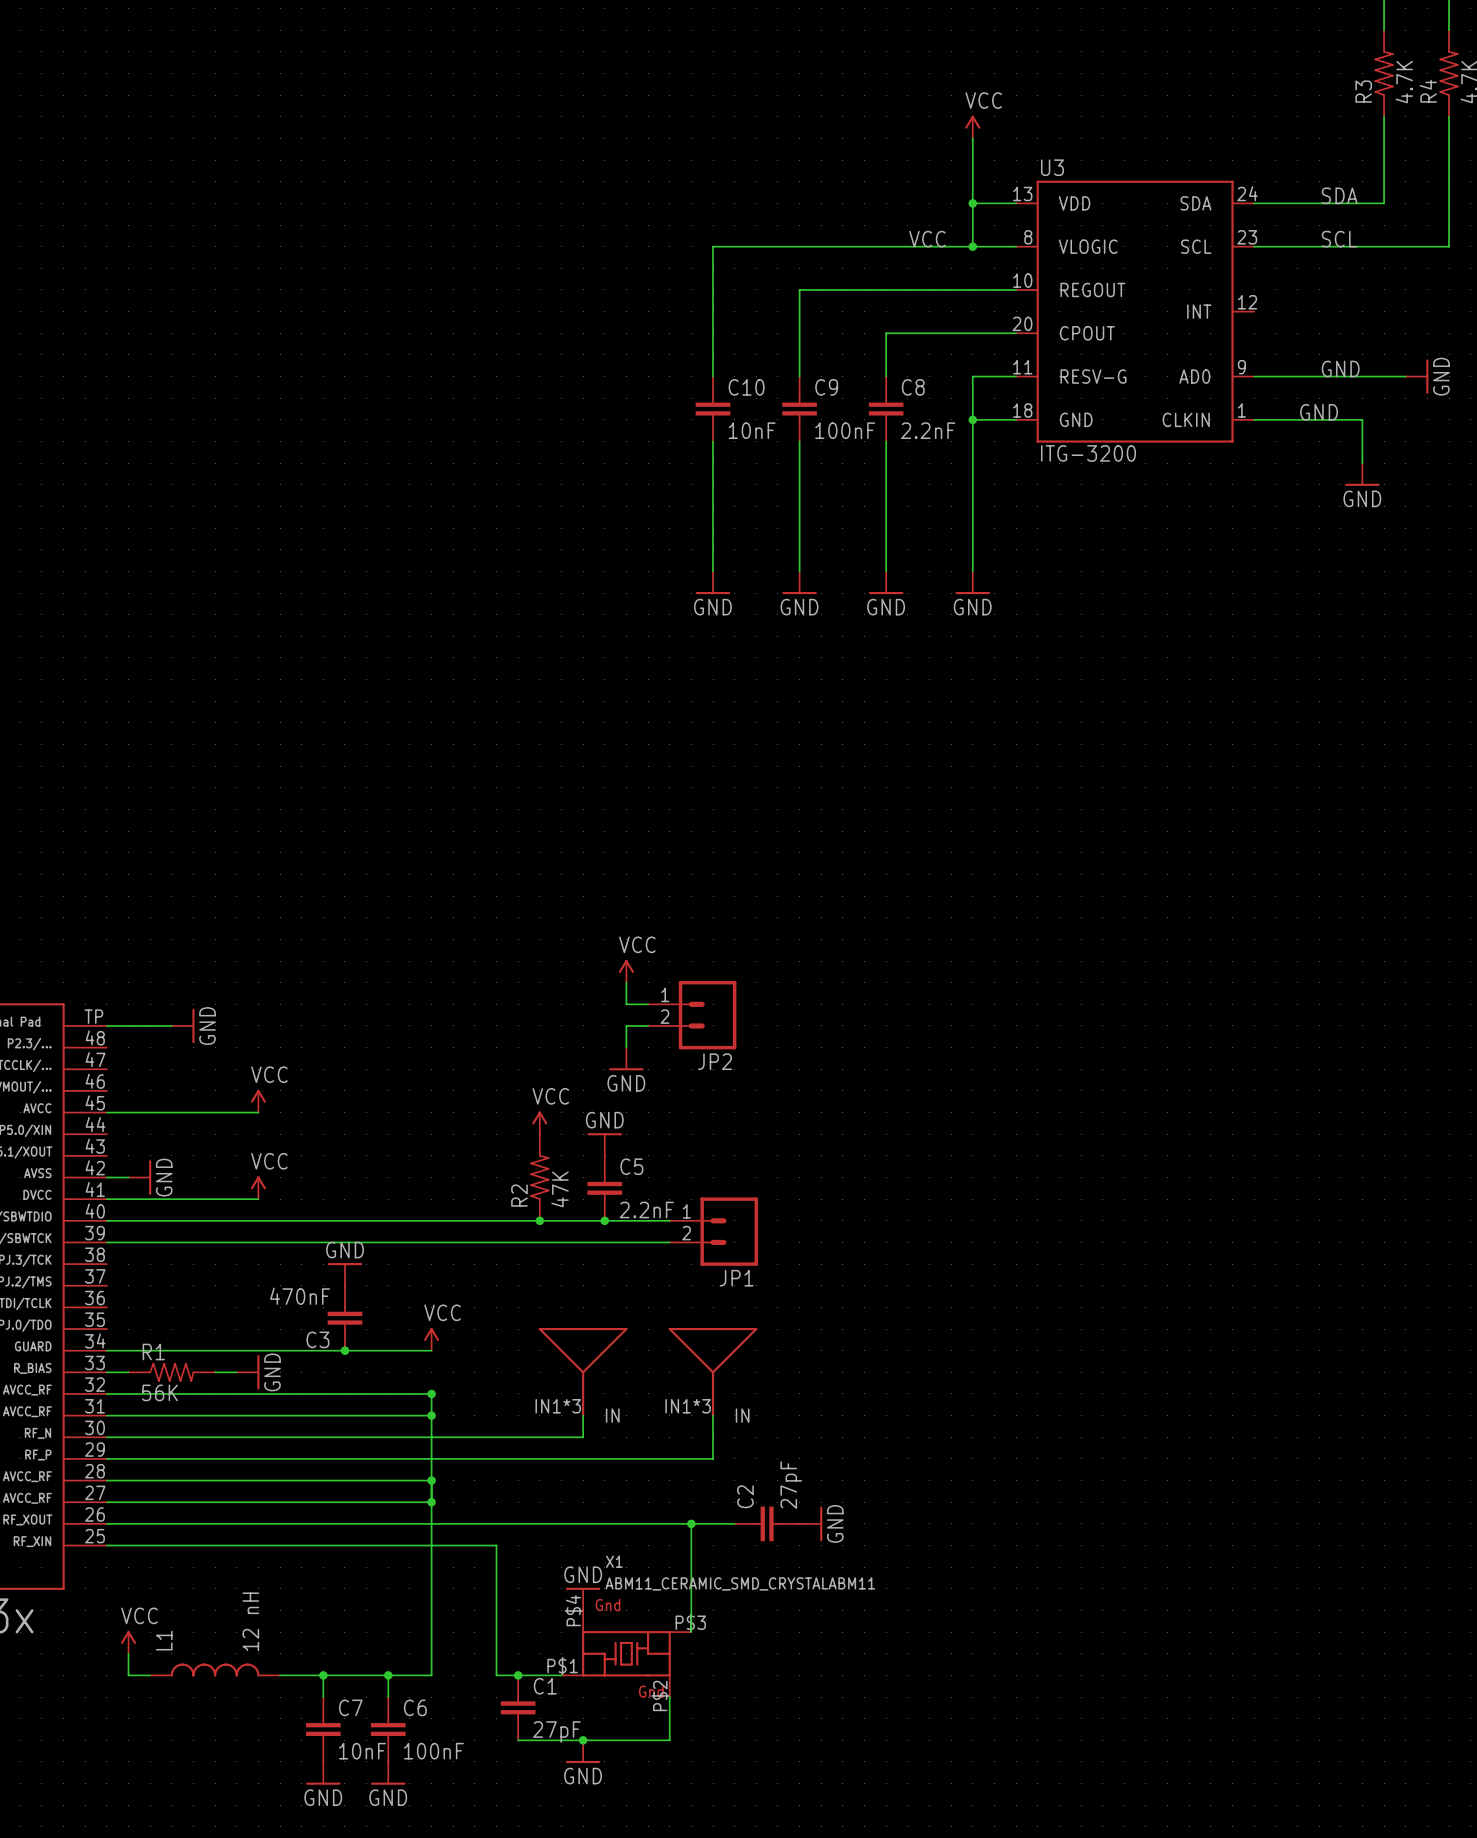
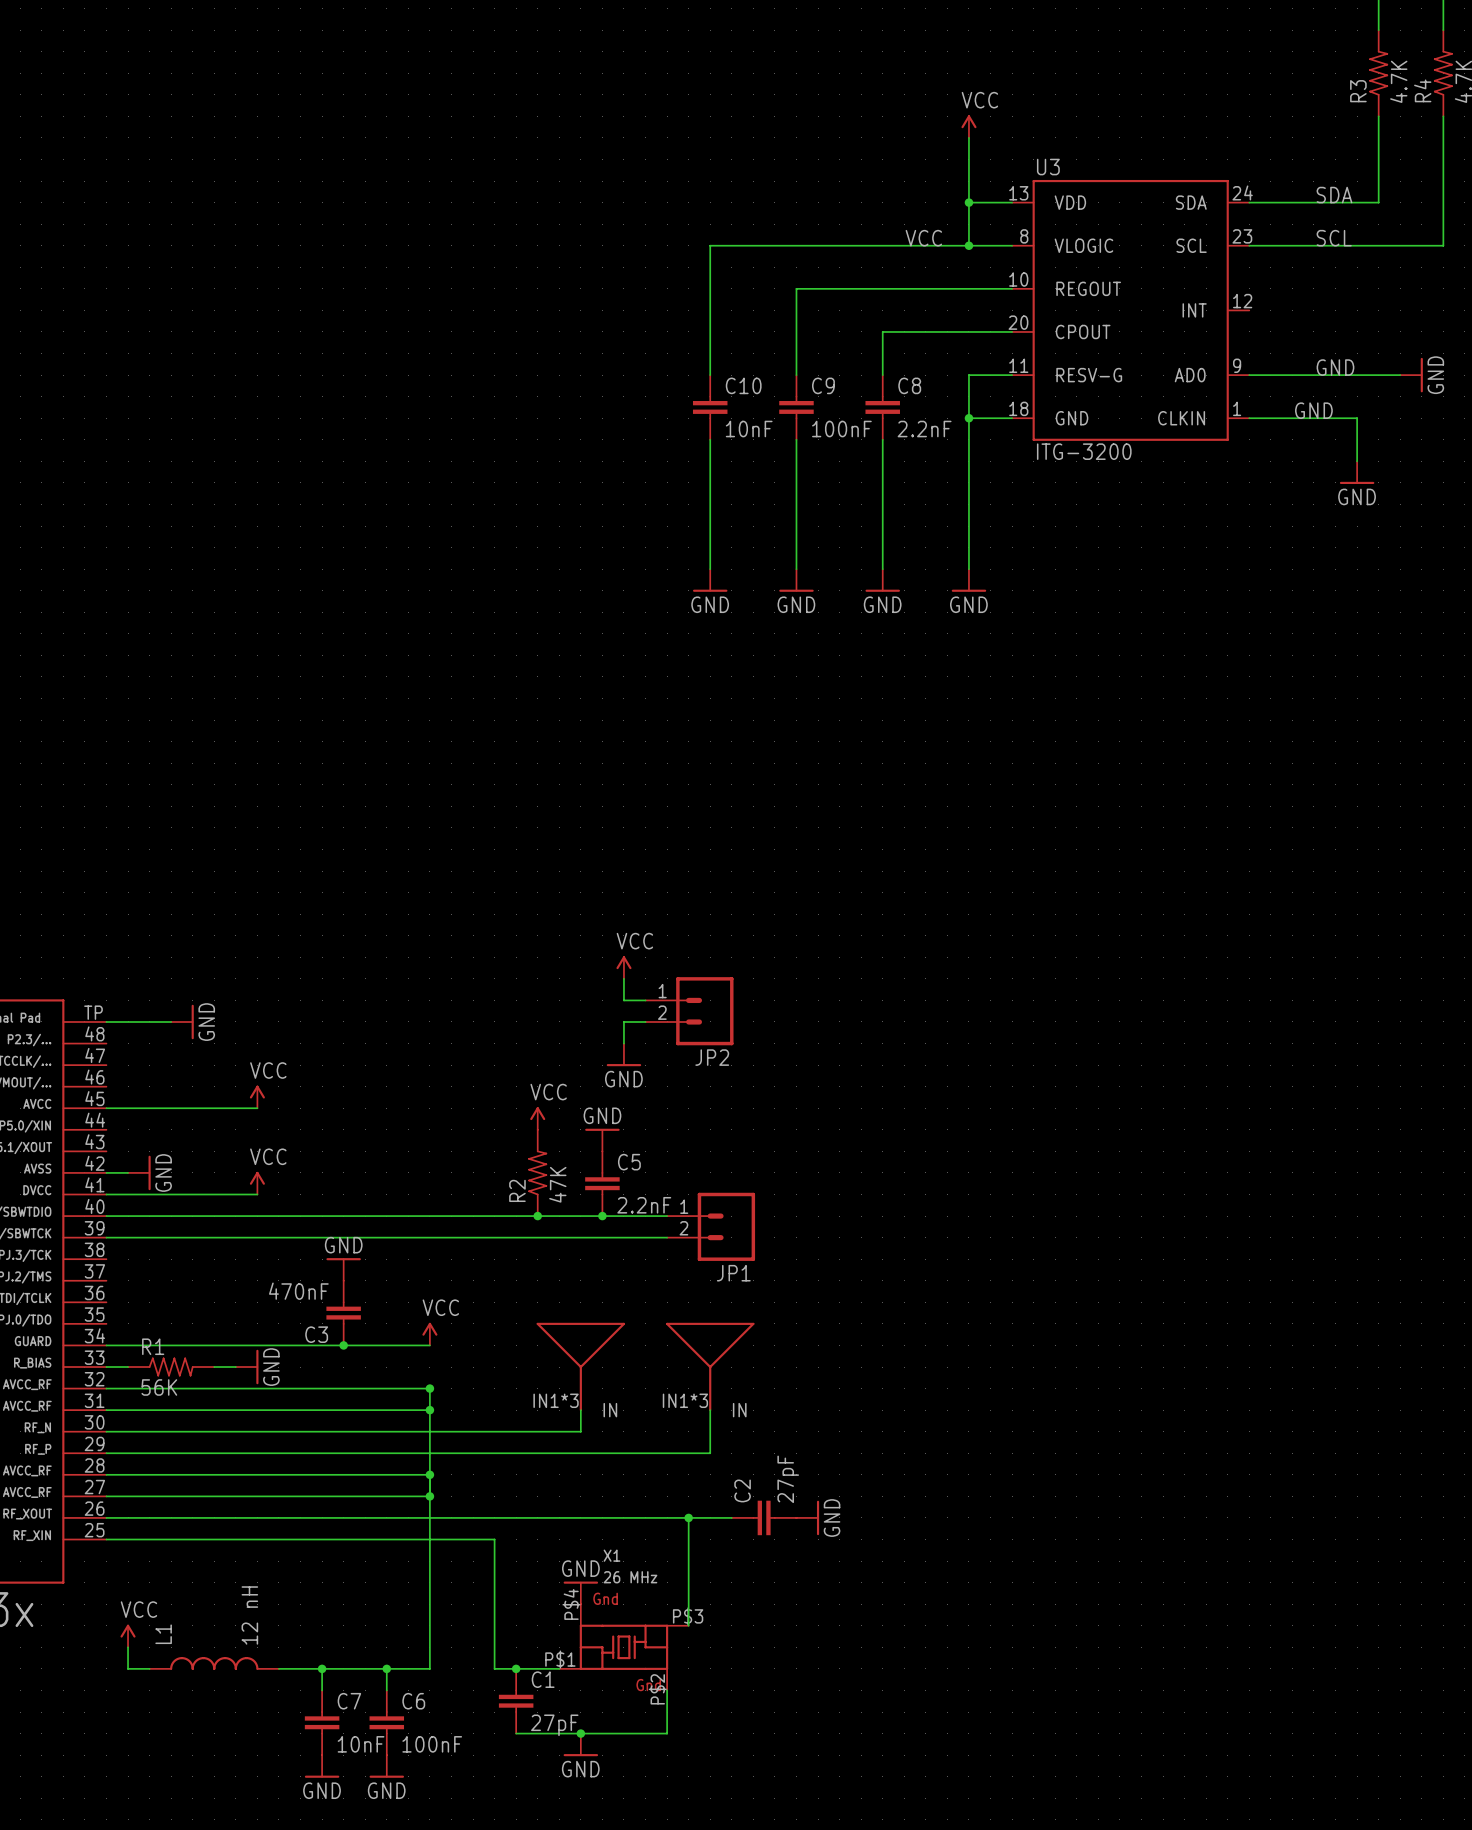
X1 value: ABM11_CERAMIC_SMD_CRYSTALABM11 (740, 1583) -> 26 MHz (630, 1577)

